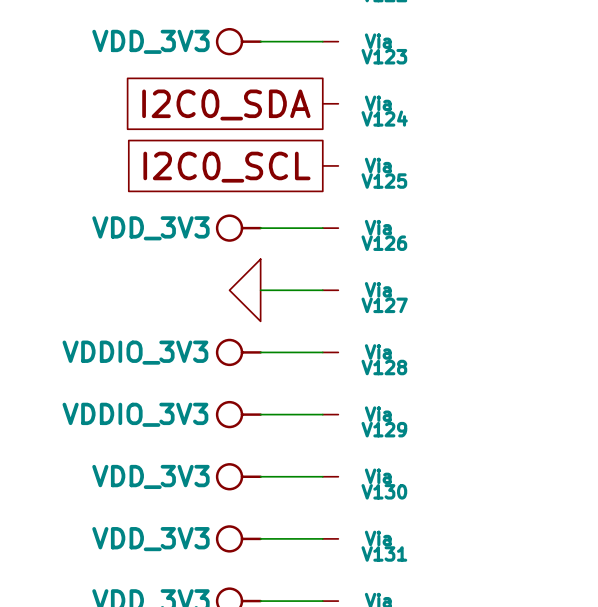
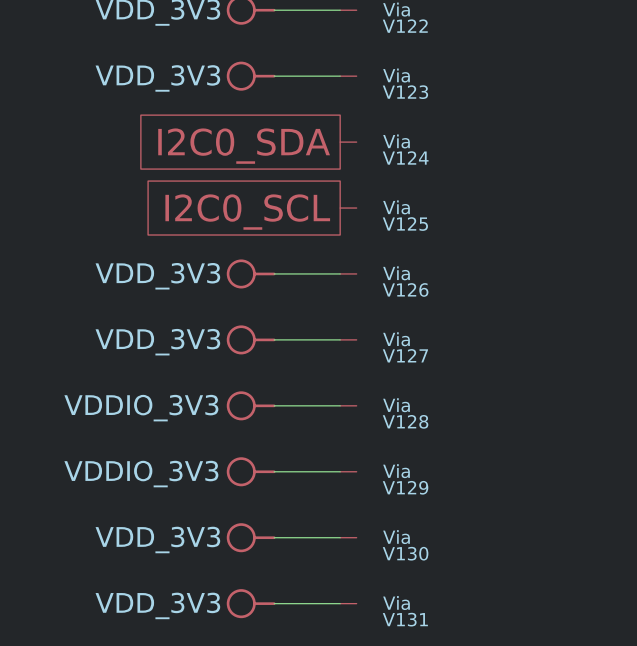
power symbol shape: [229, 259, 261, 322] -> [226, 325, 276, 355]
power symbol text: none -> VDD_3V3 (157, 342)

